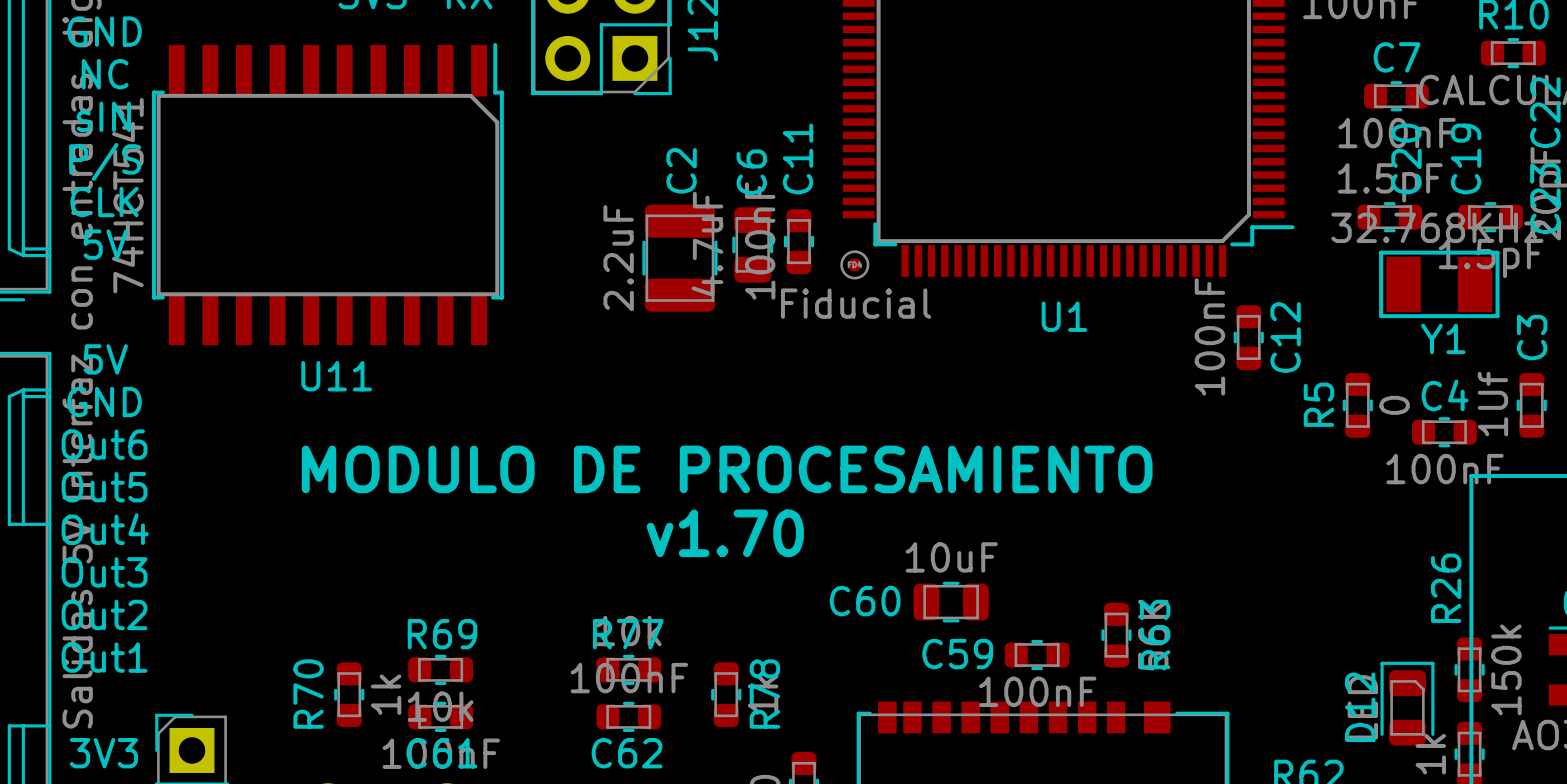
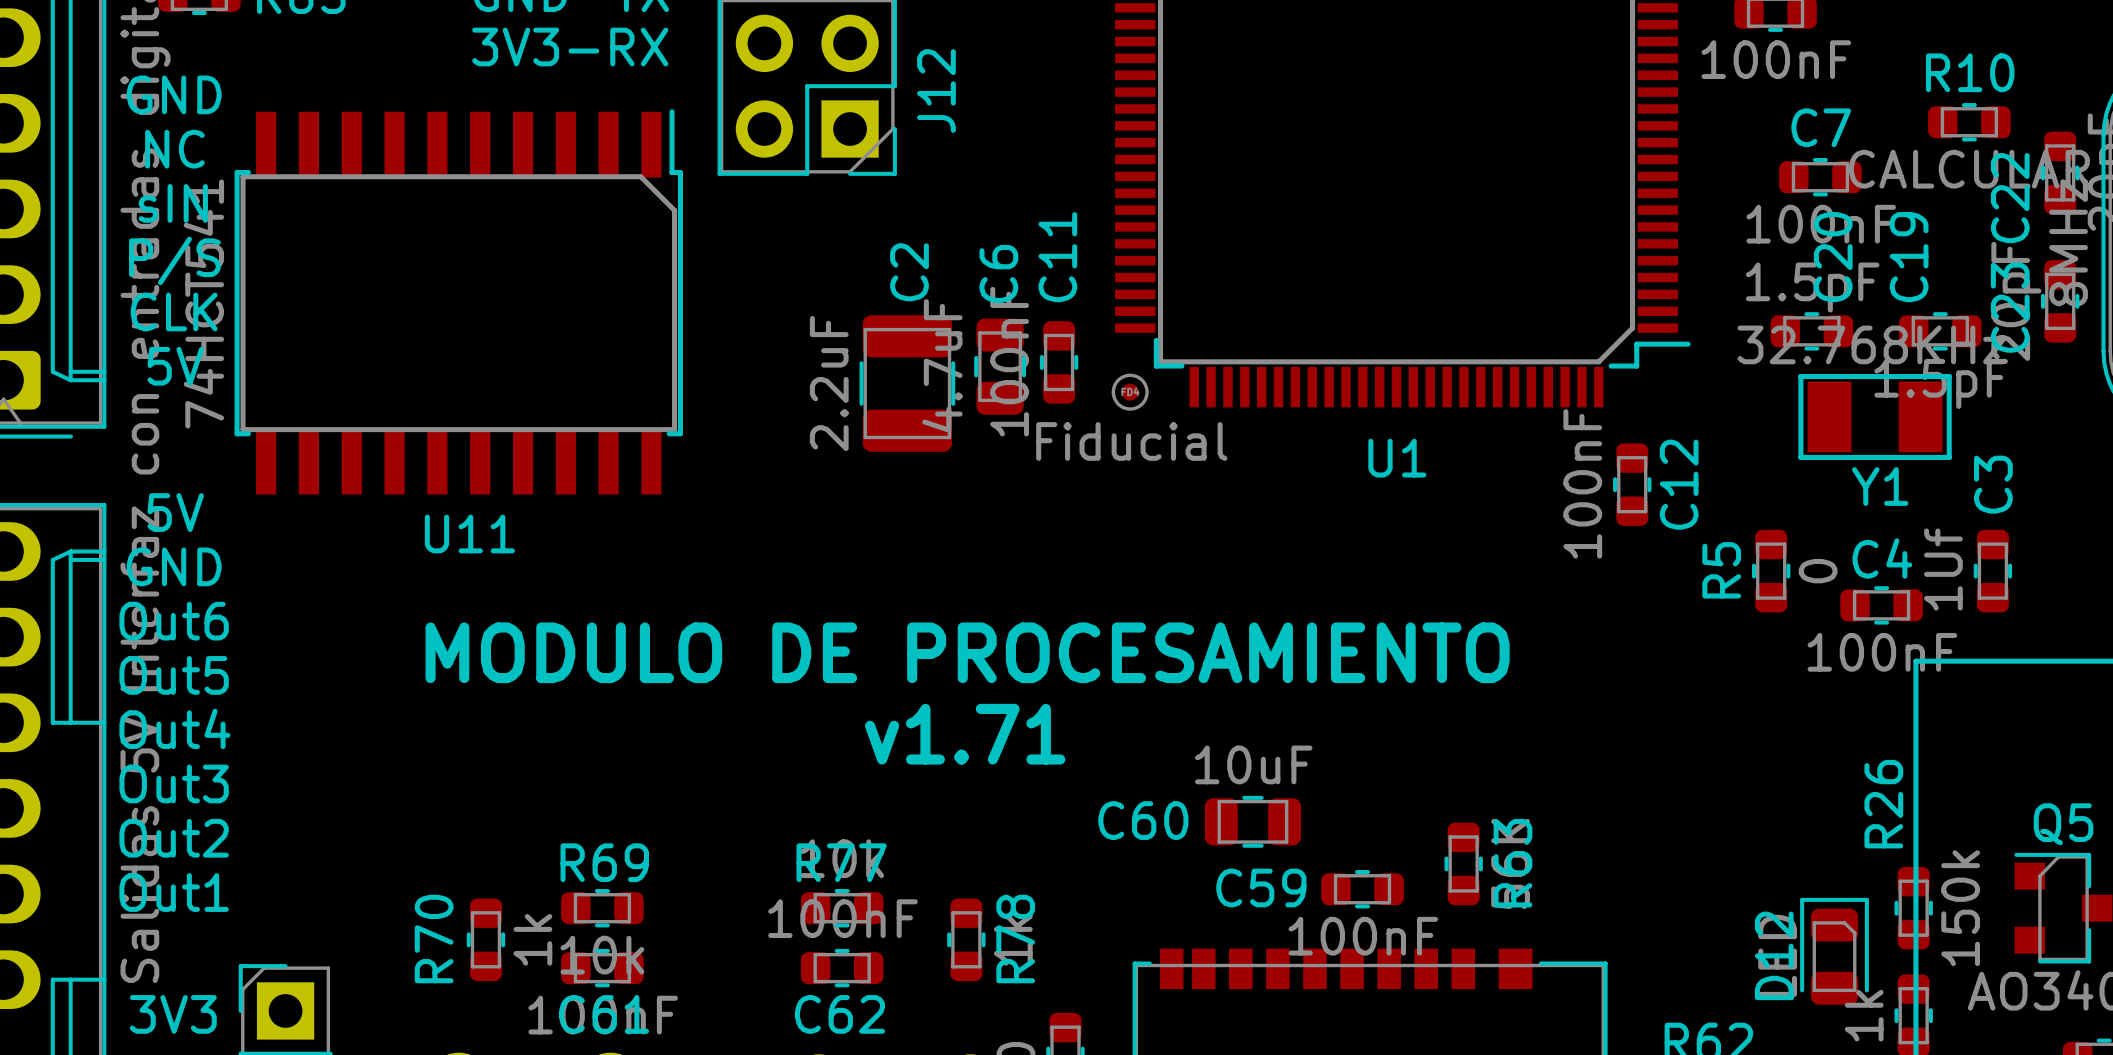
text: v1.70 (725, 533) -> v1.71 (965, 734)

